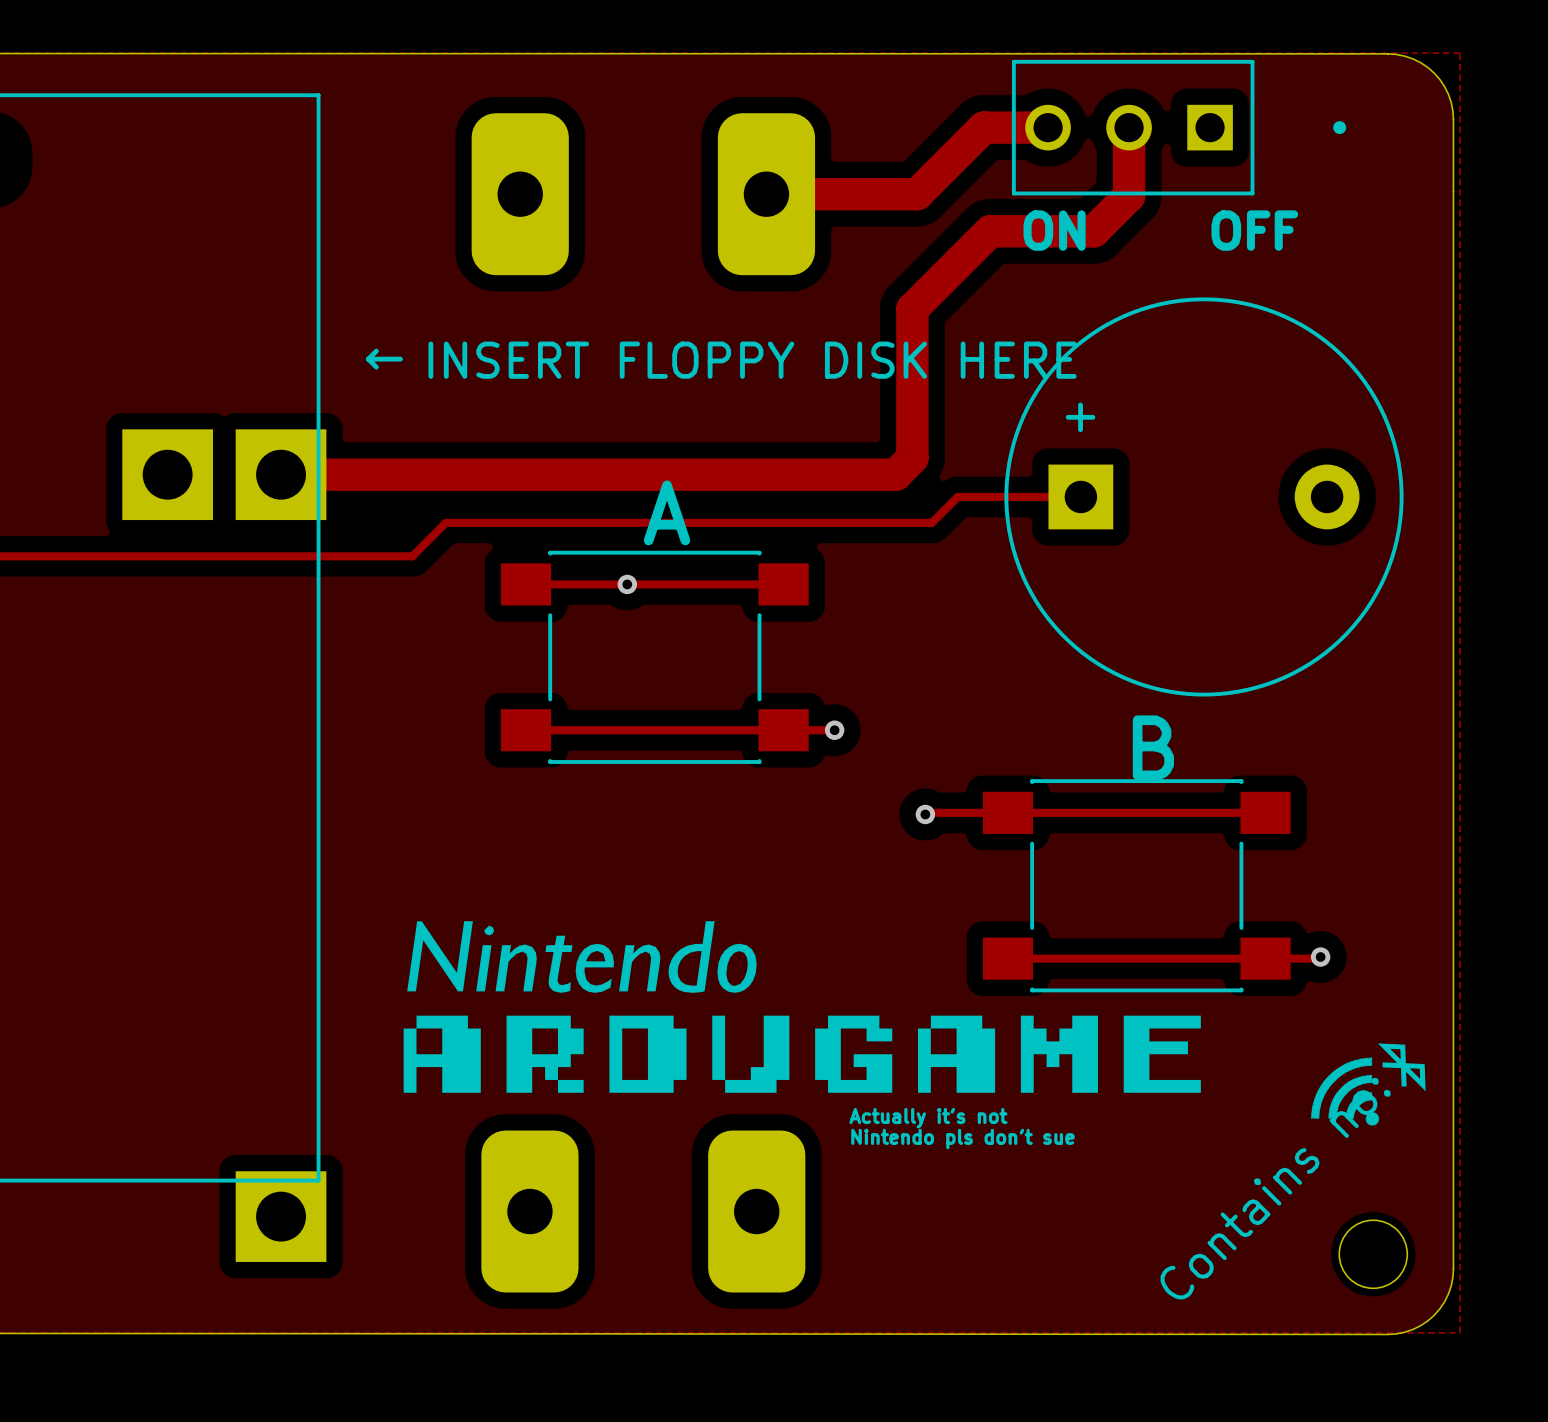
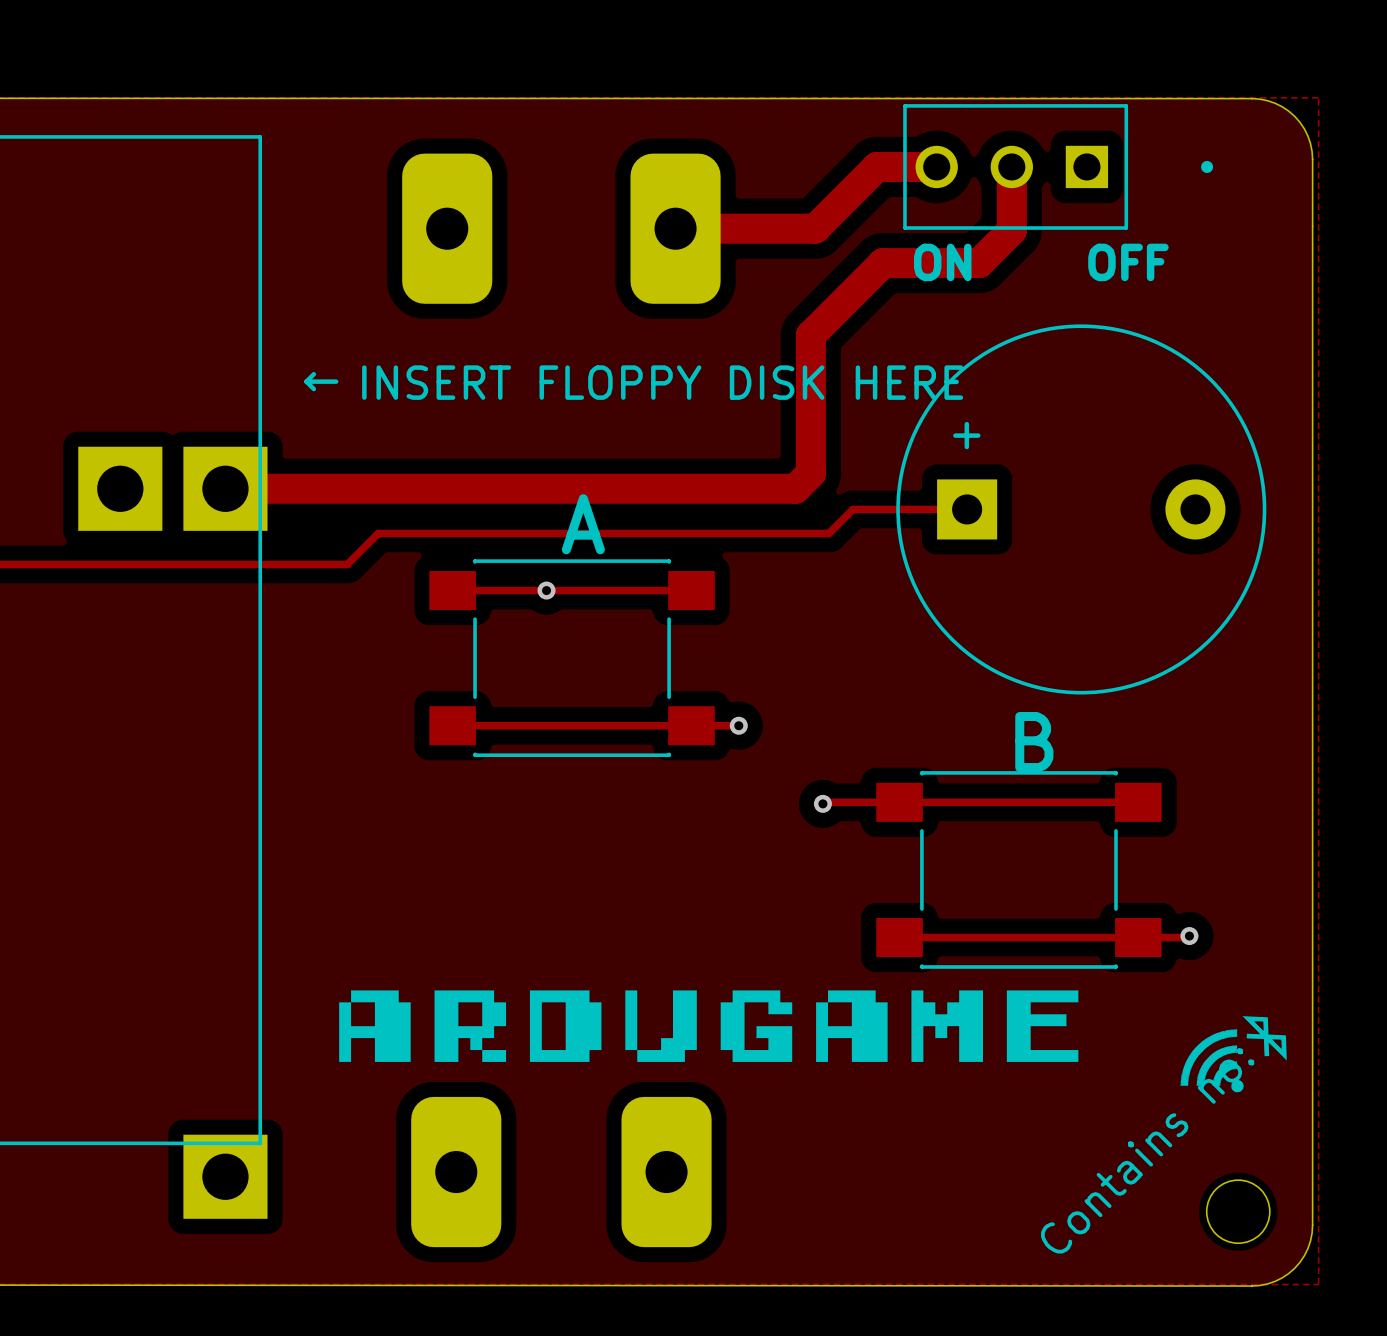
drawing: [407, 921, 757, 993] -> none
text: Actually it's not (928, 1118) -> none
text: Nintendo pls don't sue (962, 1139) -> none

